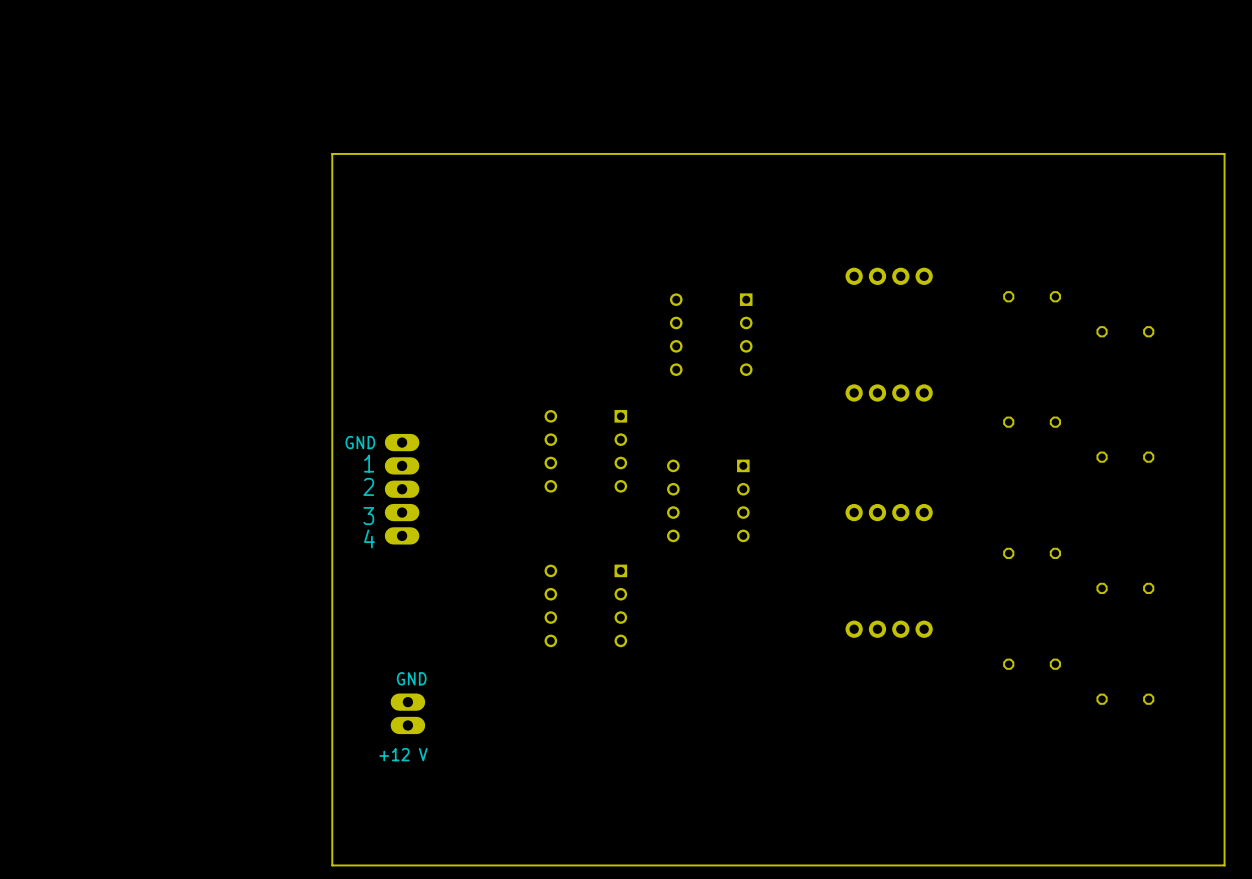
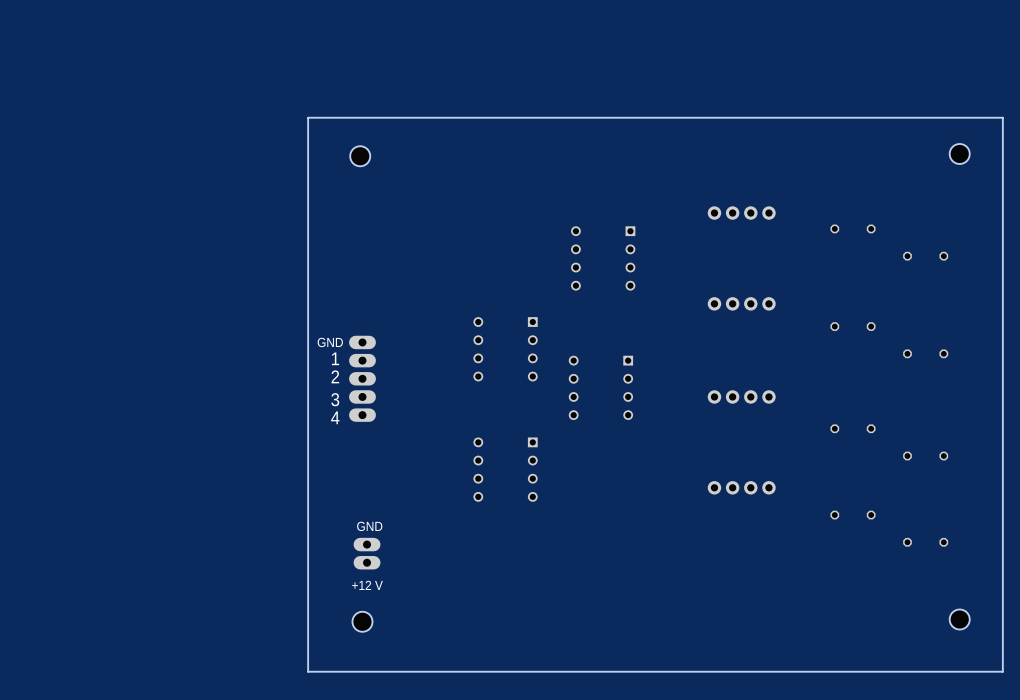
part: none -> (959, 153)
part: none -> (360, 156)
part: none -> (959, 619)
part: none -> (362, 621)

